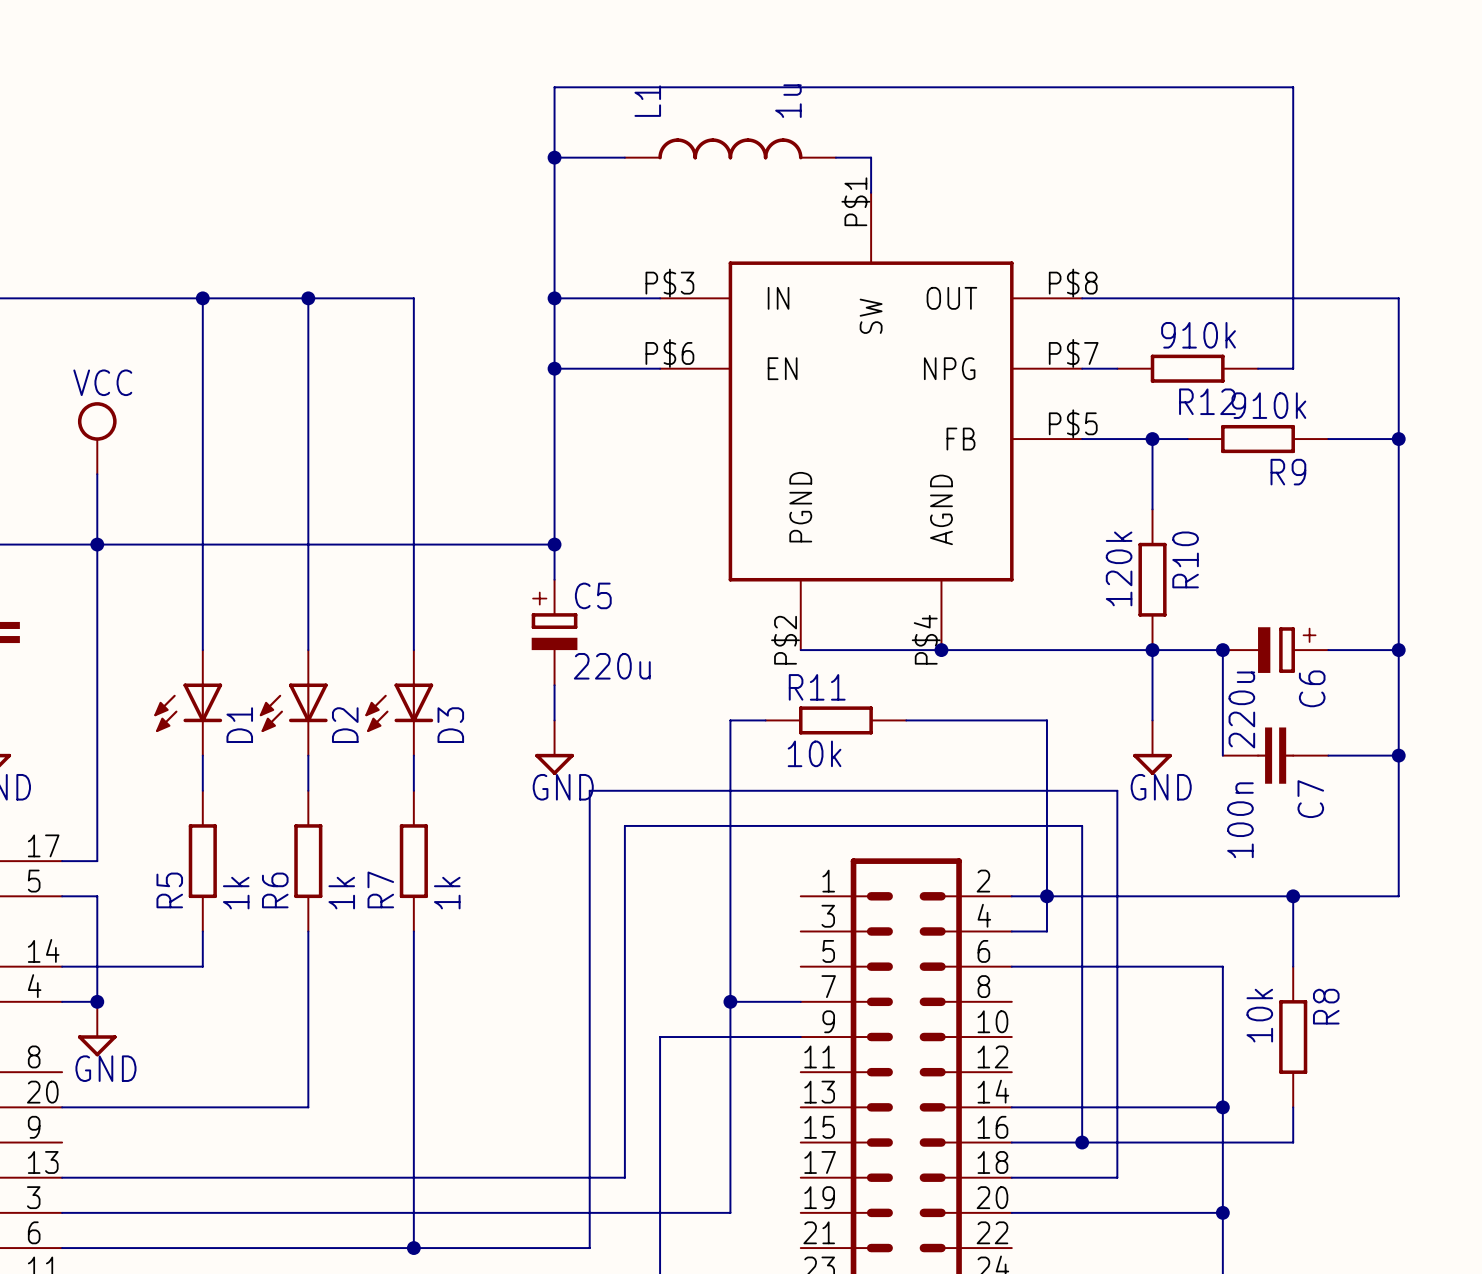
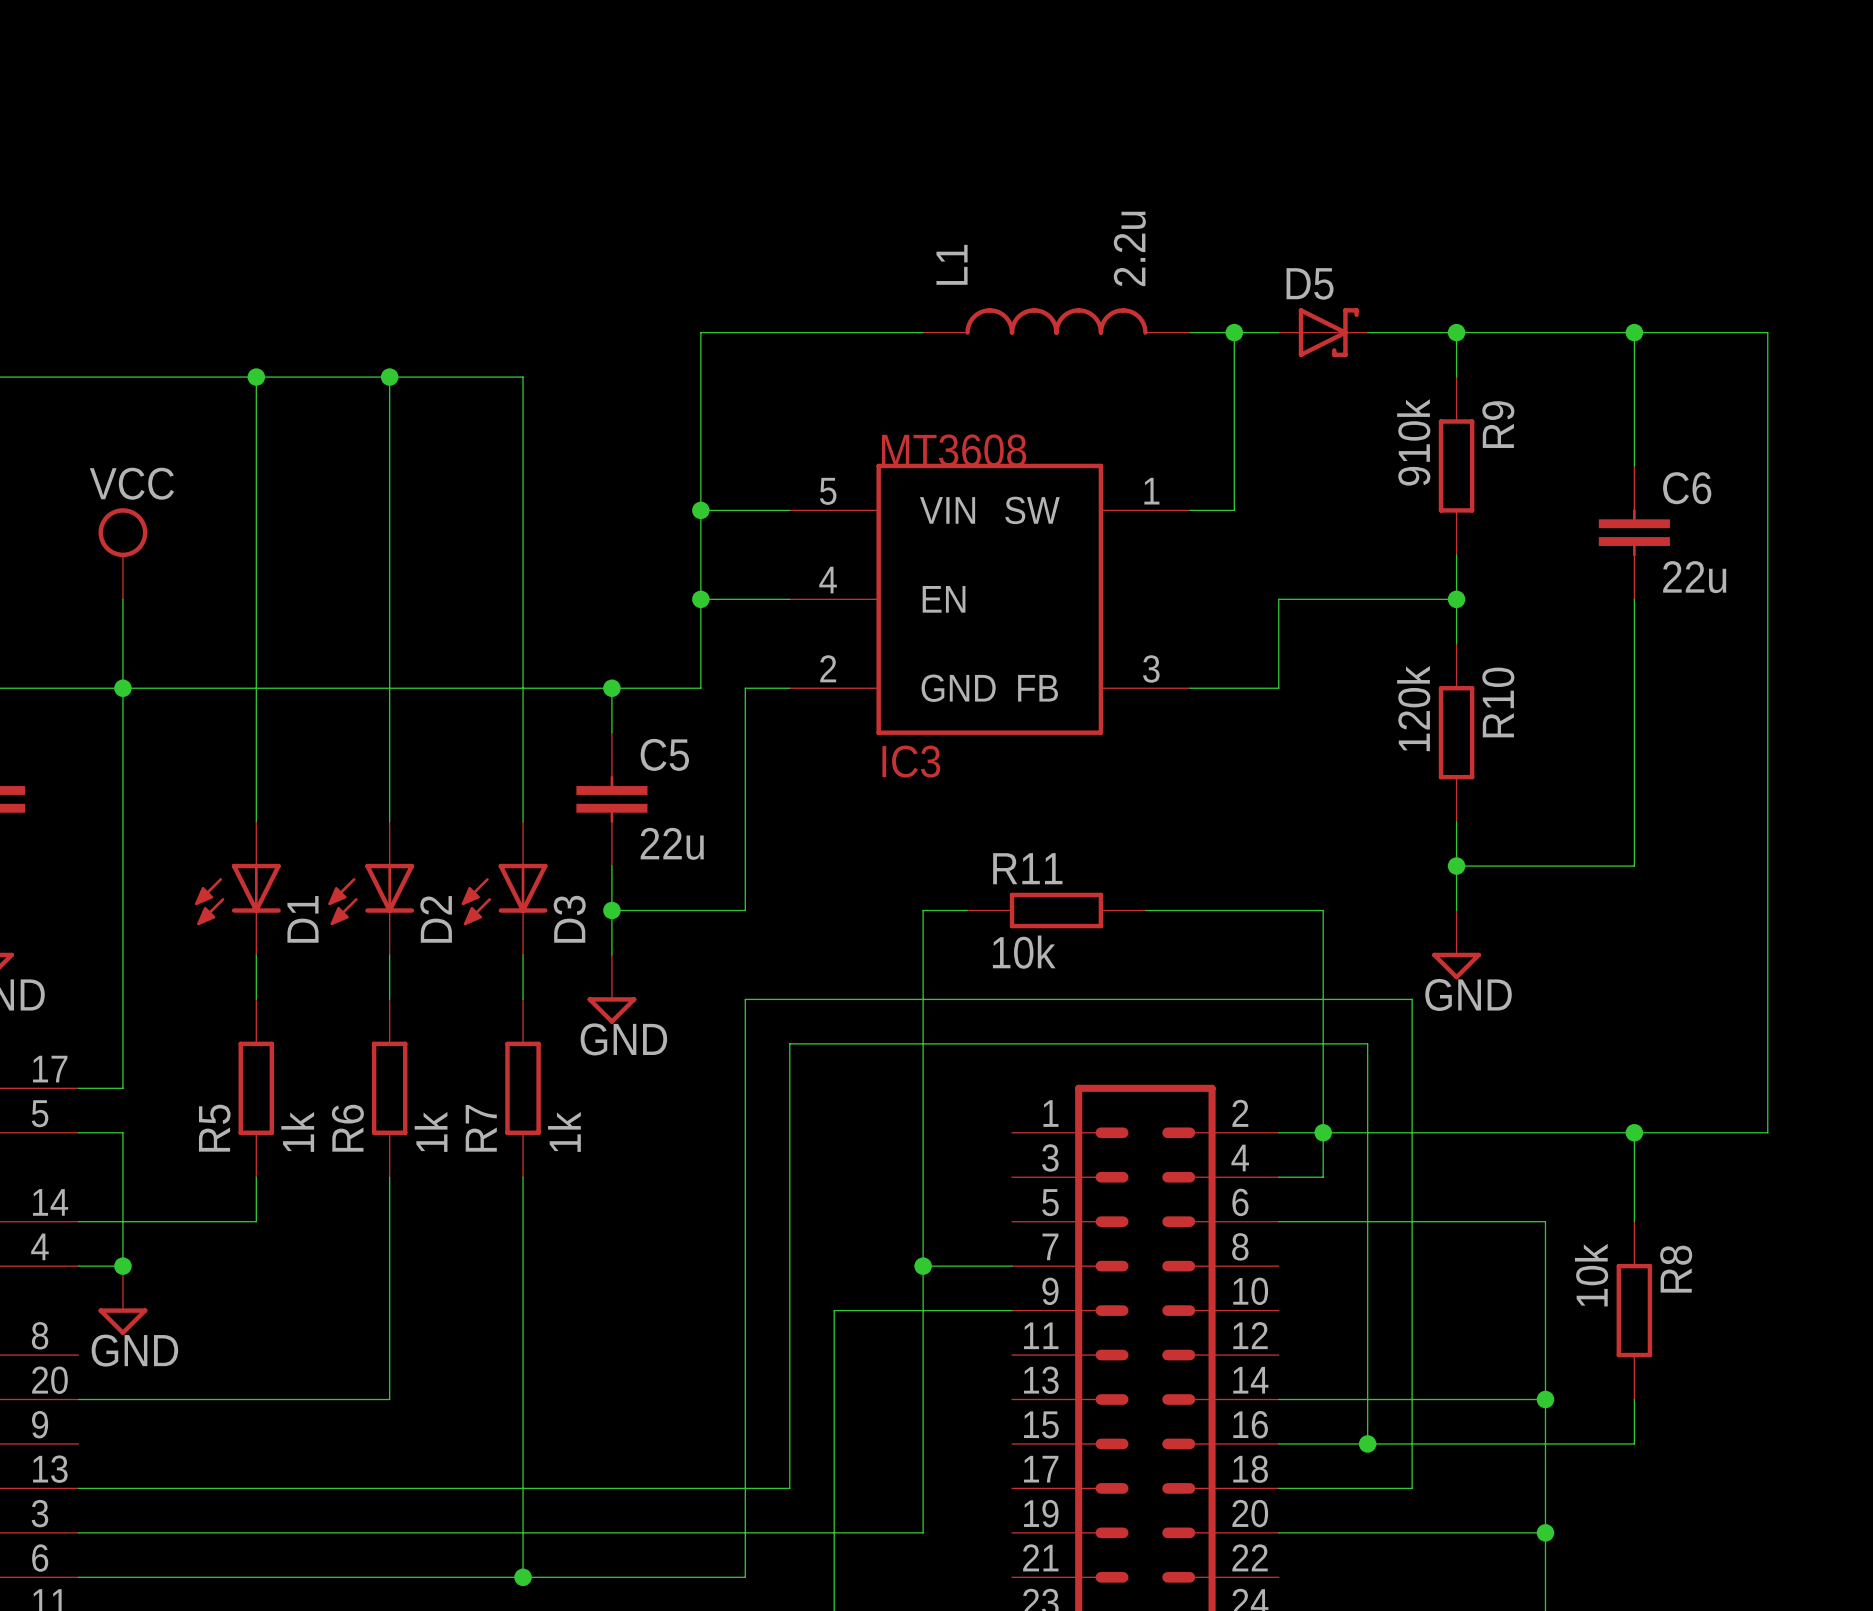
L1 value: 1u (788, 101) -> 2.2u (1129, 248)
L1 position: (730, 148) -> (1056, 321)
wire: (554, 157) (624, 157) -> (700, 510) (789, 510)
junction: (554, 157) -> none
wire: (835, 157) (871, 157) (871, 192) -> none
wire: (554, 263) (554, 87) (1293, 87) (1293, 263) -> (700, 332) (923, 332)
wire: none -> (1234, 332) (1234, 510) (1189, 510)
junction: none -> (1234, 332)
D5: none -> (1323, 332)
wire: none -> (1456, 332) (1456, 377)
junction: none -> (1456, 332)
junction: none -> (1634, 332)
wire: (554, 298) (660, 298) -> none
junction: (554, 298) -> none
wire: (1082, 298) (1398, 298) -> (1367, 332) (1767, 332) (1767, 377)
wire: (554, 368) (660, 368) -> none
junction position: (554, 368) -> (700, 510)
wire: (1082, 368) (1117, 368) -> none
R12: 910k (1187, 368) -> none
wire: (1258, 368) (1293, 368) -> none
R9 value position: 910k (1268, 405) -> 910k (1413, 442)
part: (871, 421) -> none
wire: (1082, 439) (1187, 439) -> none
junction position: (1152, 439) -> (1456, 599)
R9 rotation: 0° (1258, 439) -> 90° clockwise (1456, 465)
R9 position: (1258, 439) -> (1456, 465)
wire: (1328, 439) (1398, 439) -> none
junction: (1398, 439) -> none
R9 name position: R9 (1288, 472) -> R9 (1498, 424)
wire: none -> (700, 599) (789, 599)
junction: none -> (700, 599)
IC3: none -> MT3608 (989, 599)
wire: none -> (1456, 599) (1278, 599) (1278, 688) (1189, 688)
wire: none -> (1634, 599) (1634, 866) (1456, 866)
junction: none -> (611, 688)
wire: (554, 544) (554, 579) -> (611, 688) (611, 732)
junction: (554, 544) -> none
wire: none -> (789, 688) (745, 688) (745, 910) (611, 910)
C5 symbol: [531, 579, 578, 686] -> [576, 732, 648, 867]
C6 symbol: [1222, 627, 1329, 673] -> [1598, 465, 1670, 600]
wire: (800, 650) (1222, 650) (1222, 755) -> none
junction: (941, 650) -> none
junction position: (1152, 650) -> (1456, 866)
junction: (1222, 650) -> none
wire: (1328, 650) (1398, 650) -> none
junction: (1398, 650) -> none
C5 value: 220u (612, 666) -> 22u (672, 843)
wire: none -> (611, 866) (611, 954)
wire: (554, 685) (554, 720) -> none
C6 name position: C6 (1312, 688) -> C6 (1687, 488)
C6 value: 220u (1241, 709) -> 22u (1694, 577)
junction: none -> (611, 910)
power symbol position: GND (554, 747) -> GND (611, 989)
C7: 100n (1275, 755) -> none
wire: (1328, 755) (1398, 755) -> none
junction: (1398, 755) -> none

